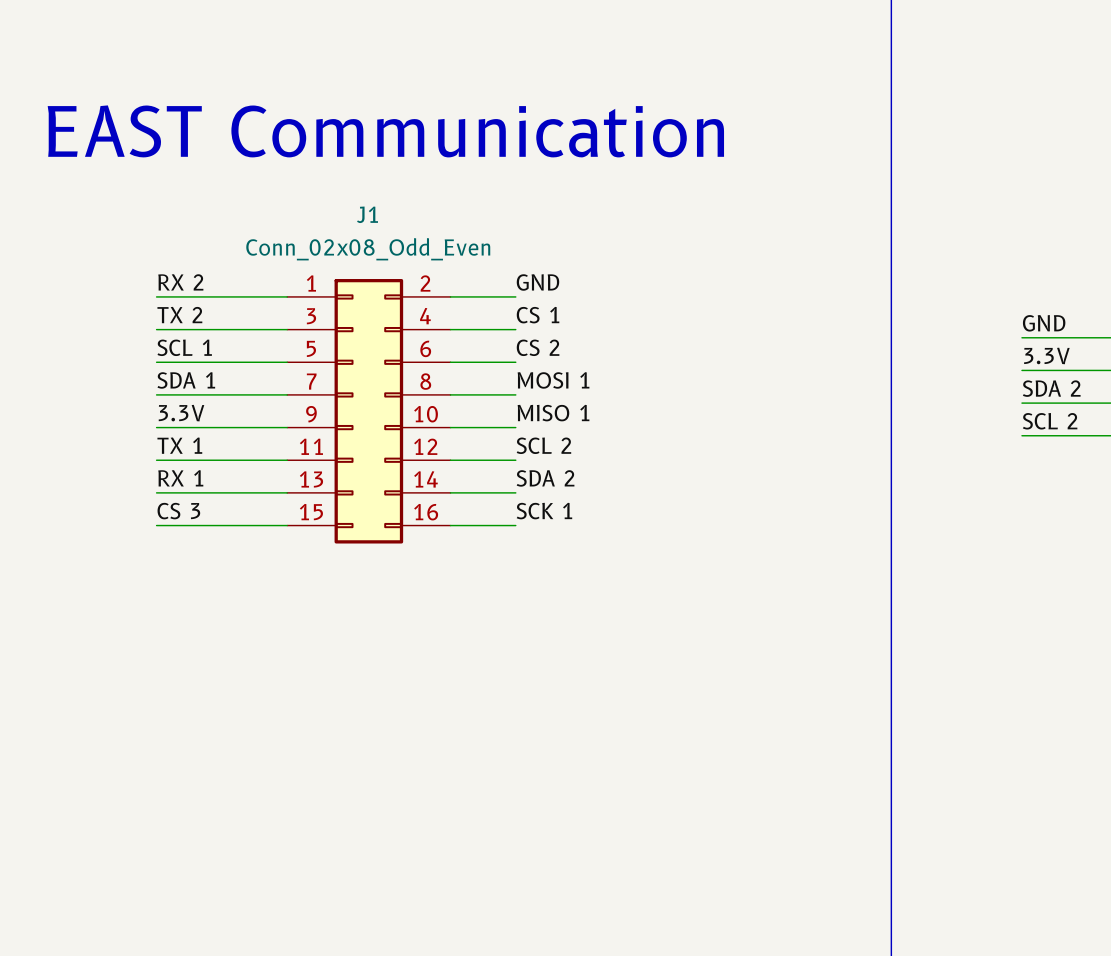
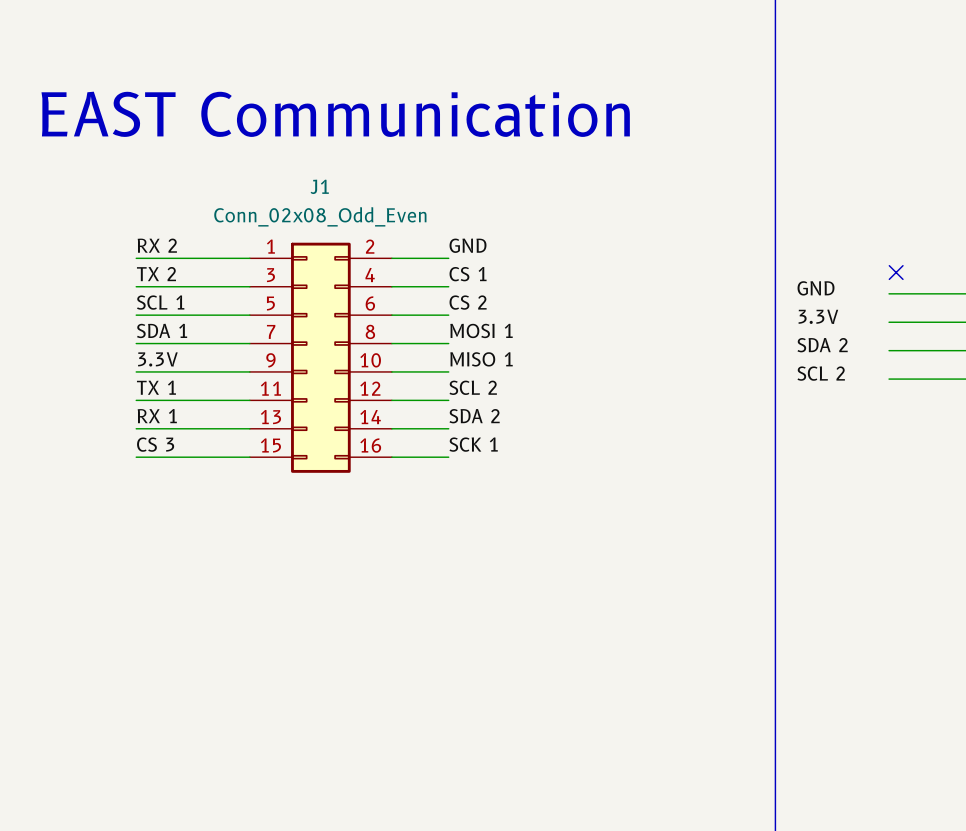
no-connect mark: none -> (896, 272)
label position: GND (1044, 323) -> GND (816, 288)
label position: 3.3V (1046, 355) -> 3.3V (818, 316)
label position: SDA 2 (1051, 388) -> SDA 2 (822, 345)
label position: SCL 2 (1050, 421) -> SCL 2 (821, 373)

